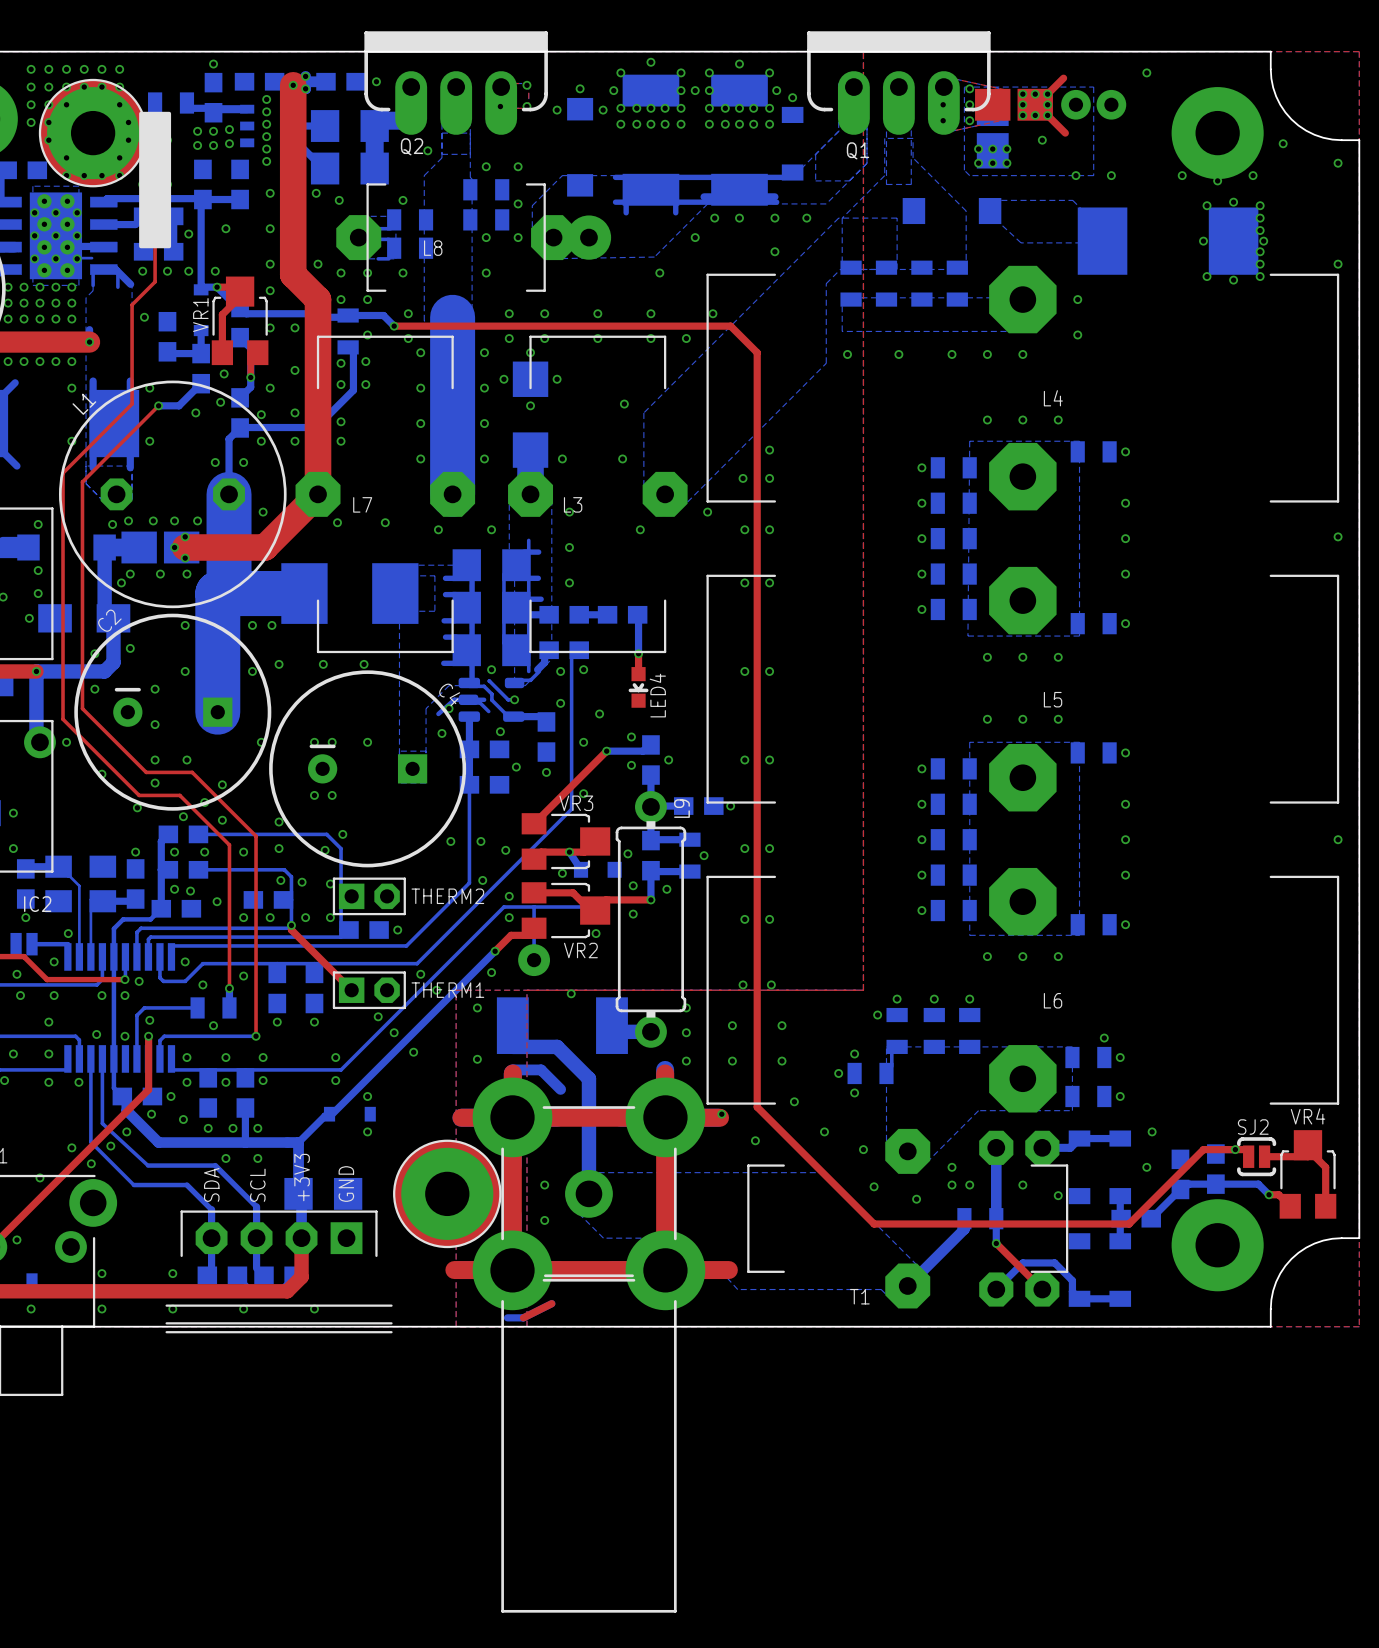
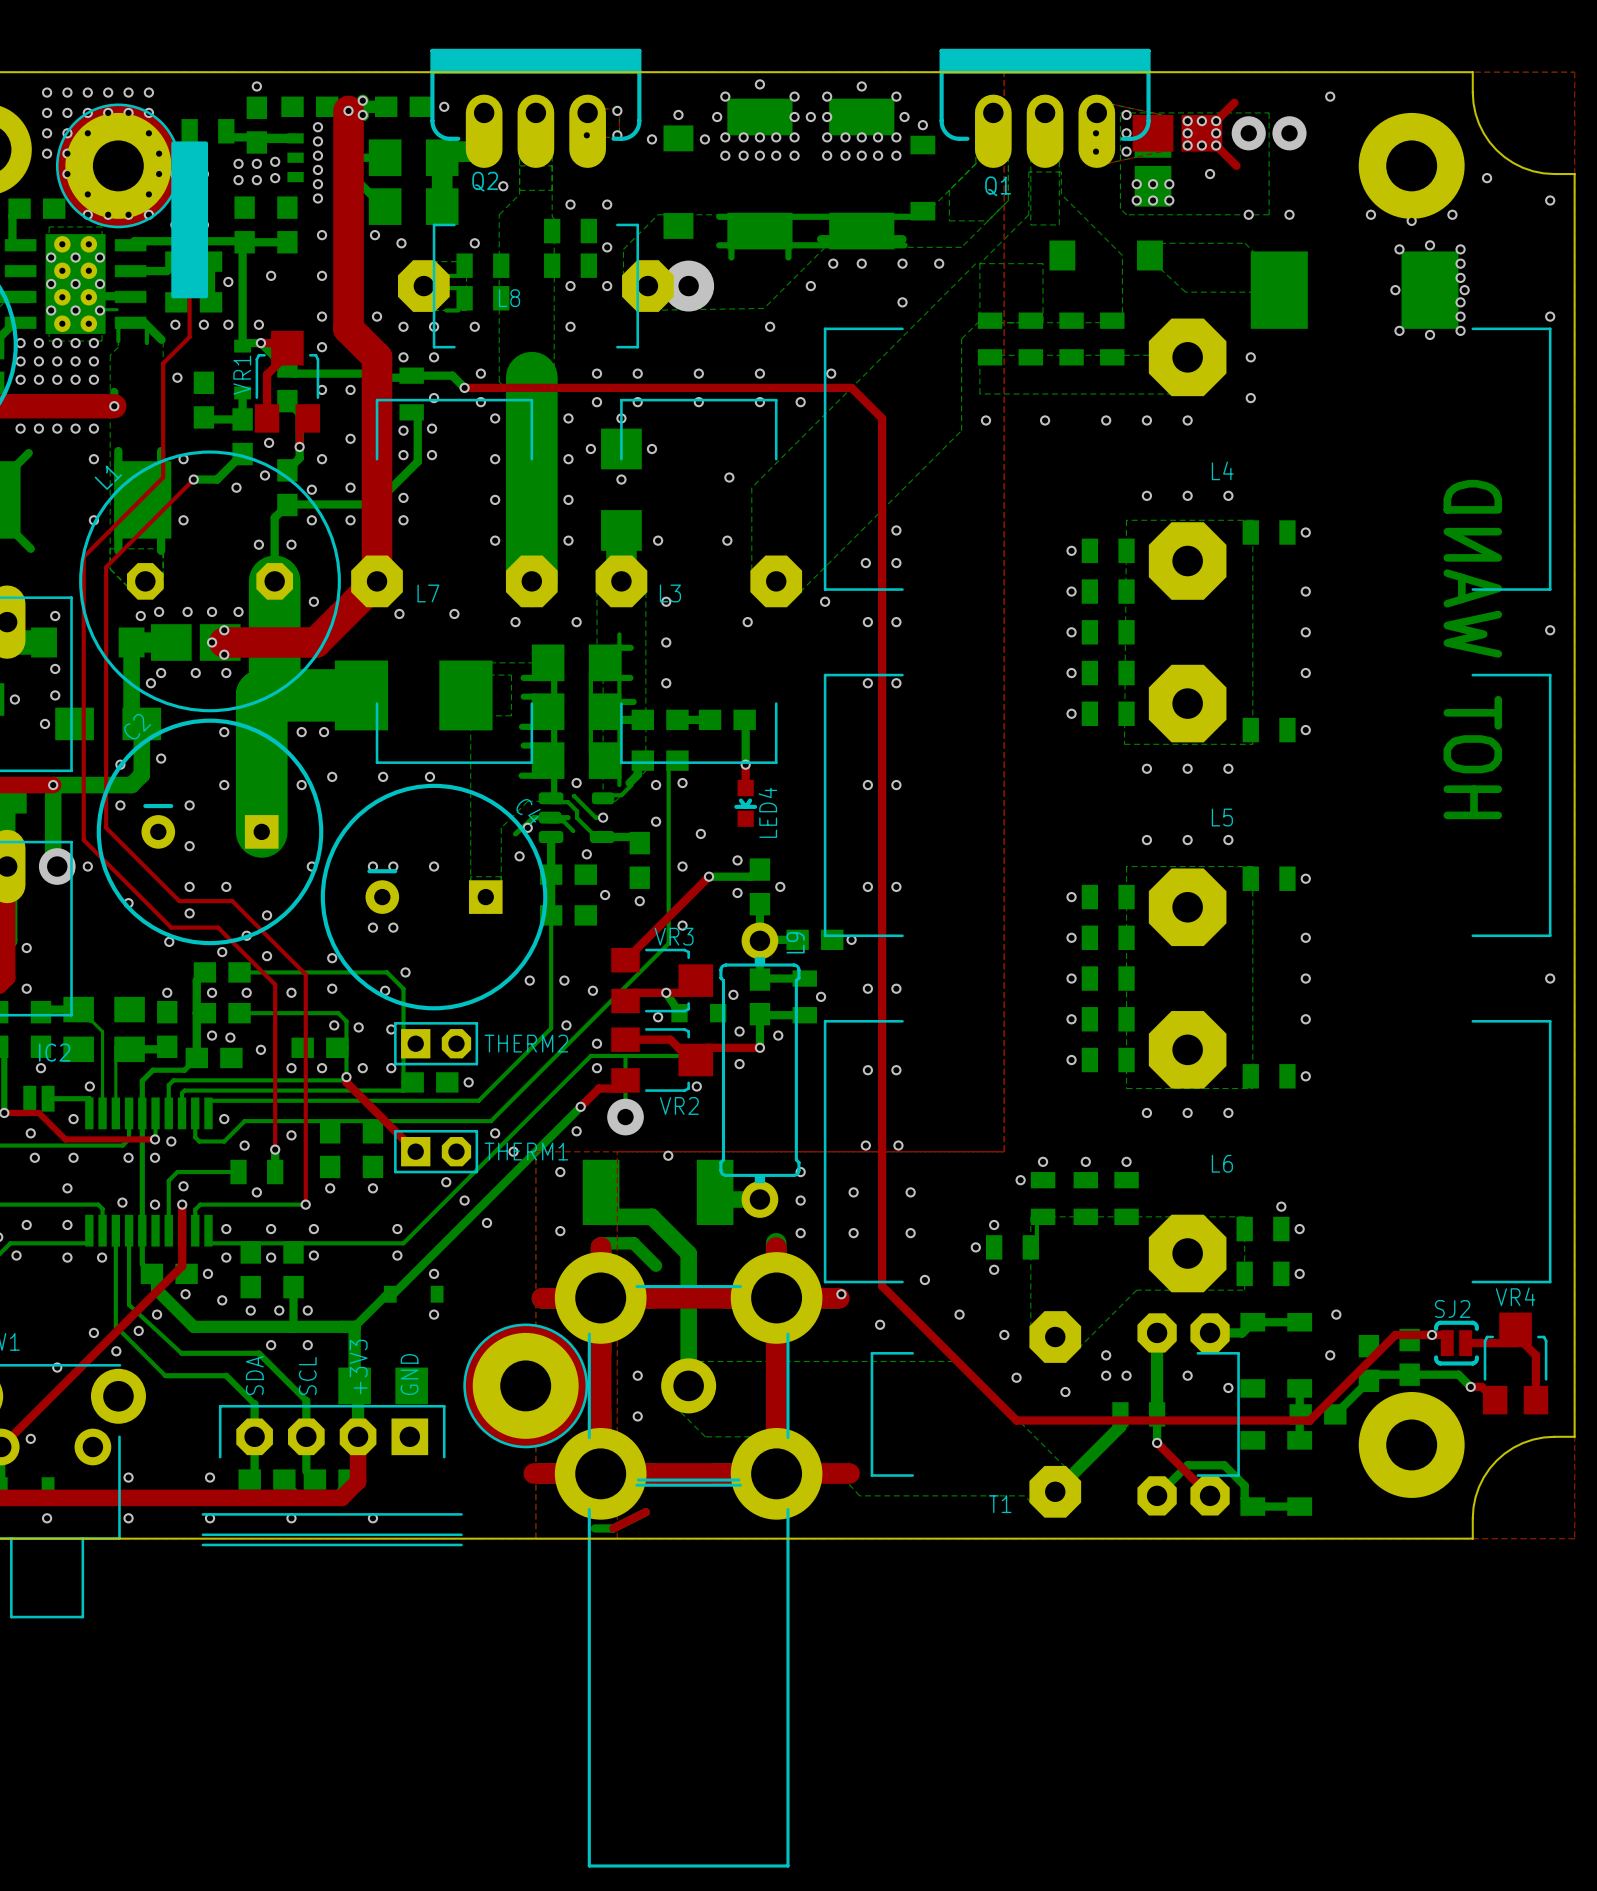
drawing: none -> [1443, 479, 1503, 820]

